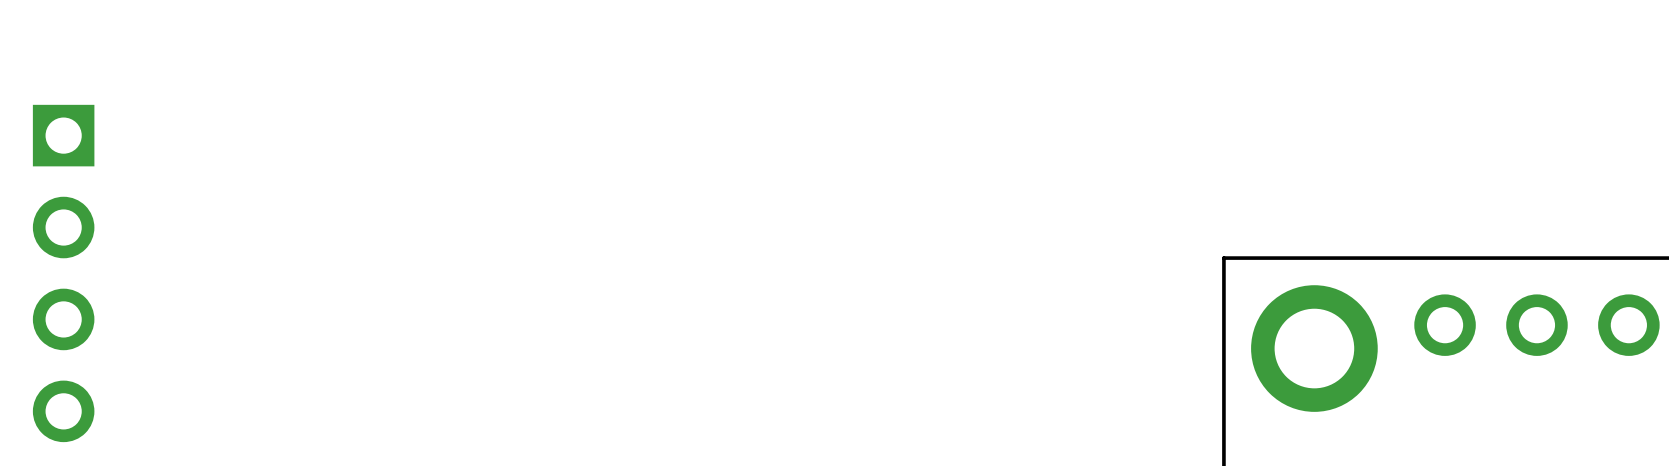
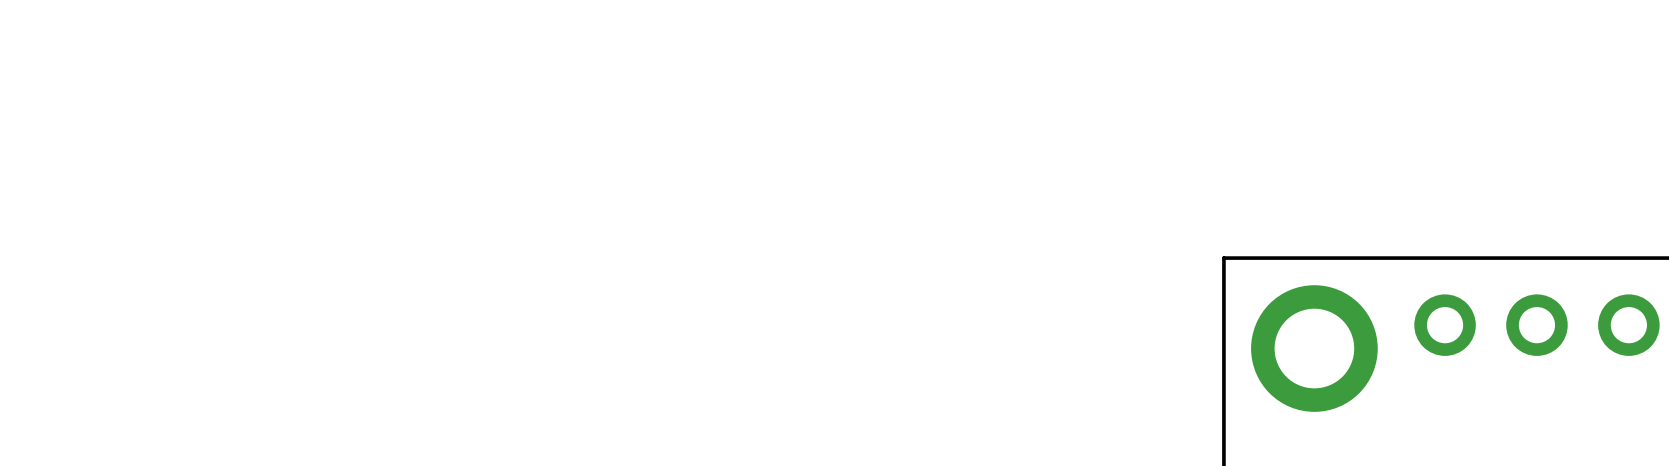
part: (63, 273) -> none

